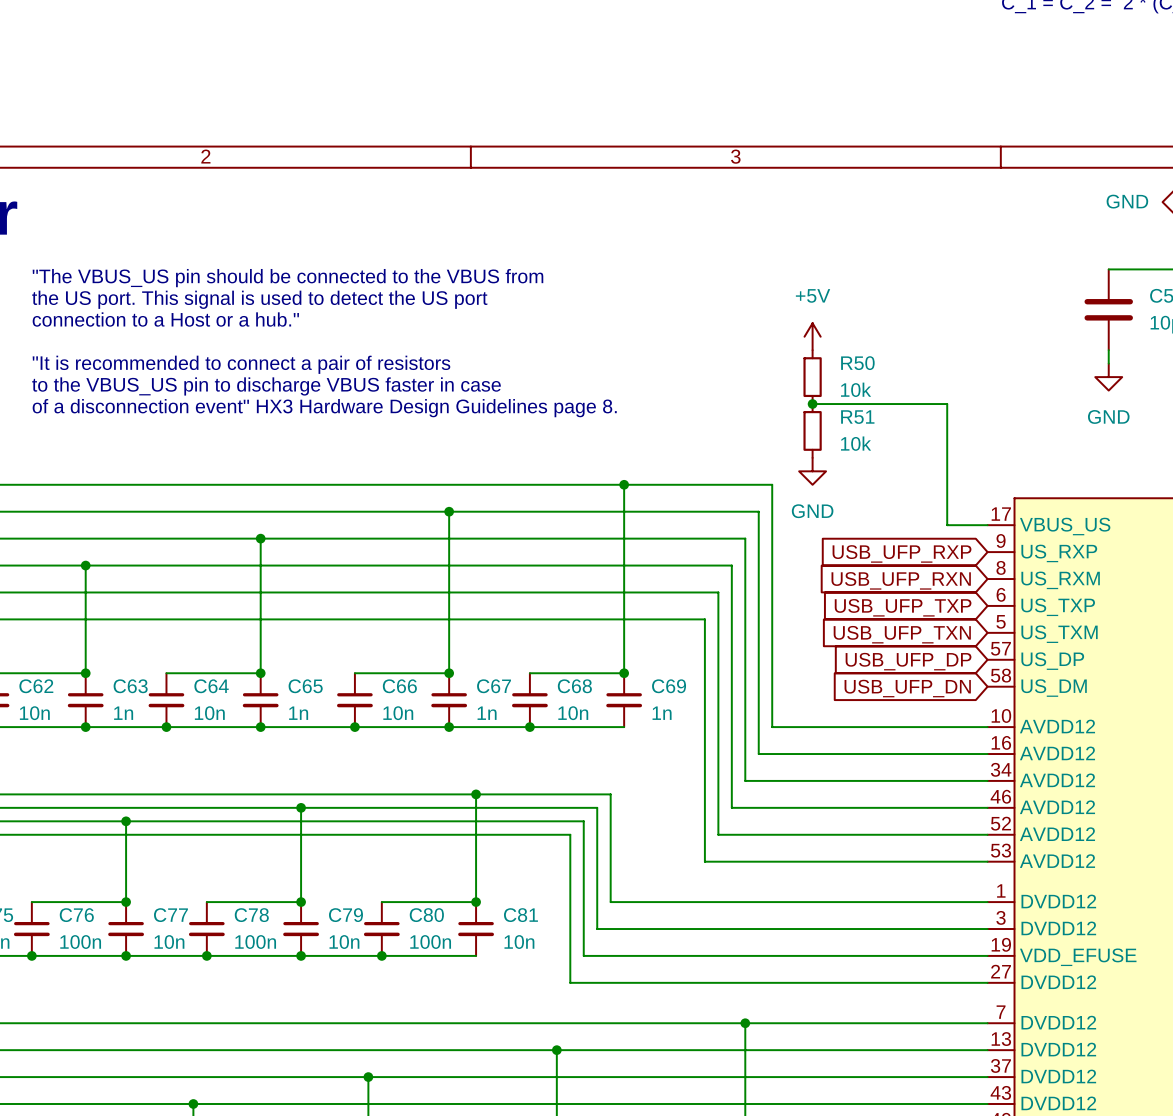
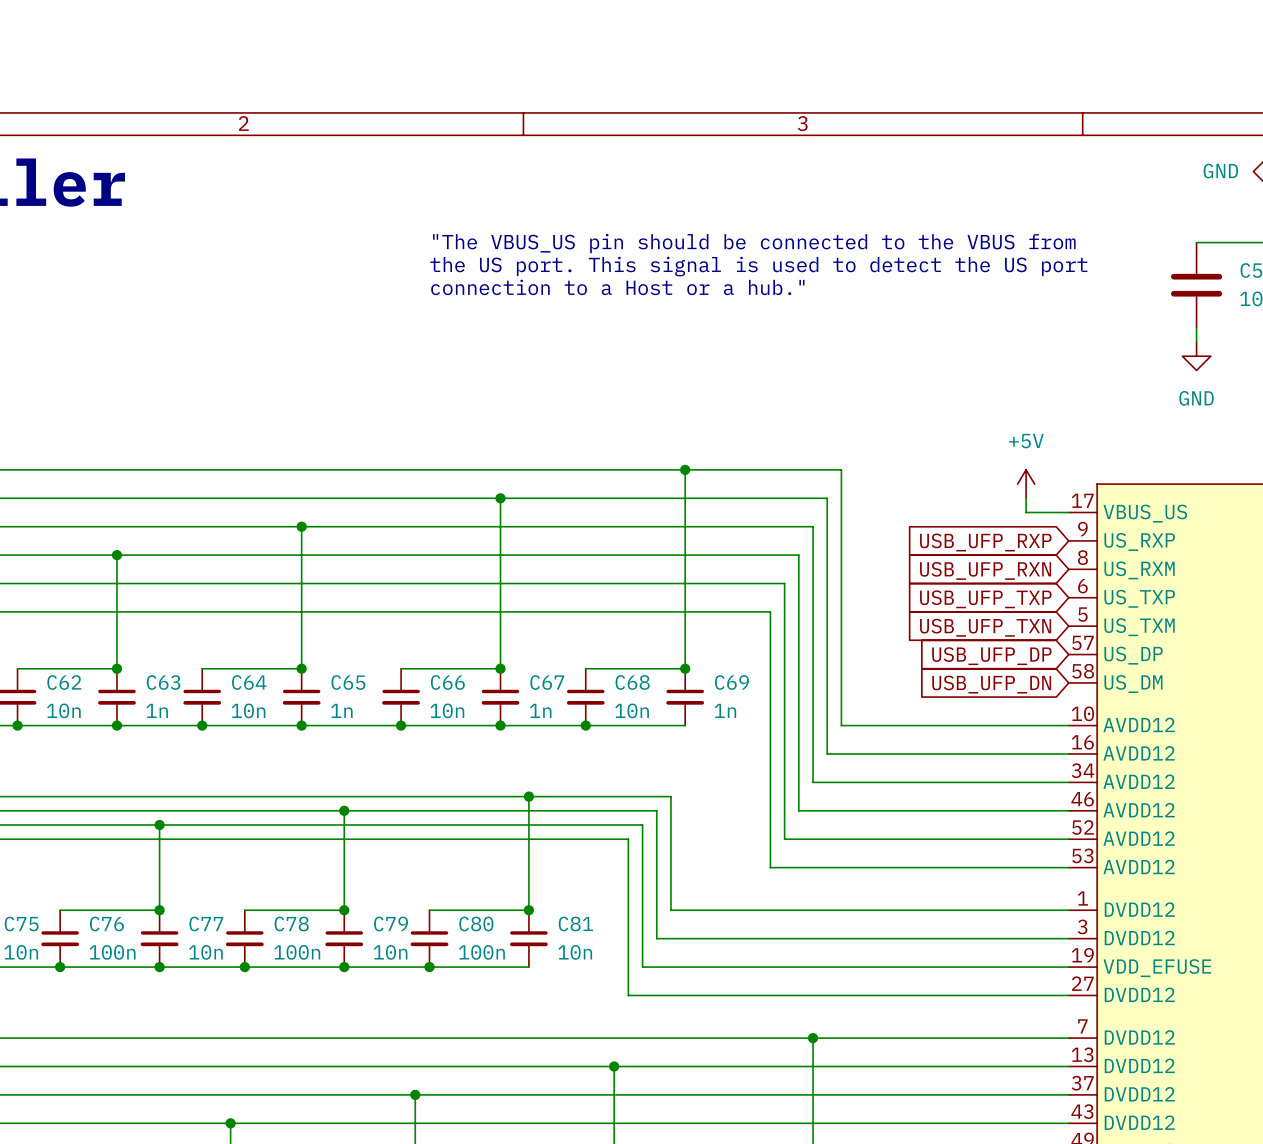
text: none -> "The VBUS_US pin should be connected to the VBUS from (754, 243)
text: "The VBUS_US pin should be connected to the VBUS from (287, 278) -> none
text: none -> the US port. This signal is used to detect the US port (758, 266)
text: the US port. This signal is used to detect the US port (259, 299) -> none
text: none -> connection to a Host or a hub." (617, 287)
text: connection to a Host or a hub." (165, 319) -> none
power symbol position: +5V (812, 336) -> +5V (1026, 484)
text: "It is recommended to connect a pair of resistors (241, 364) -> none
R50: 10k (812, 377) -> none
text: to the VBUS_US pin to discharge VBUS faster in case (266, 386) -> none
wire: (812, 404) (947, 404) (947, 511) -> none
junction: (812, 404) -> none
text: of a disconnection event" HX3 Hardware Design Guidelines page 8. (324, 408) -> none
R51: 10k (812, 430) -> none
power symbol: GND (812, 471) -> none

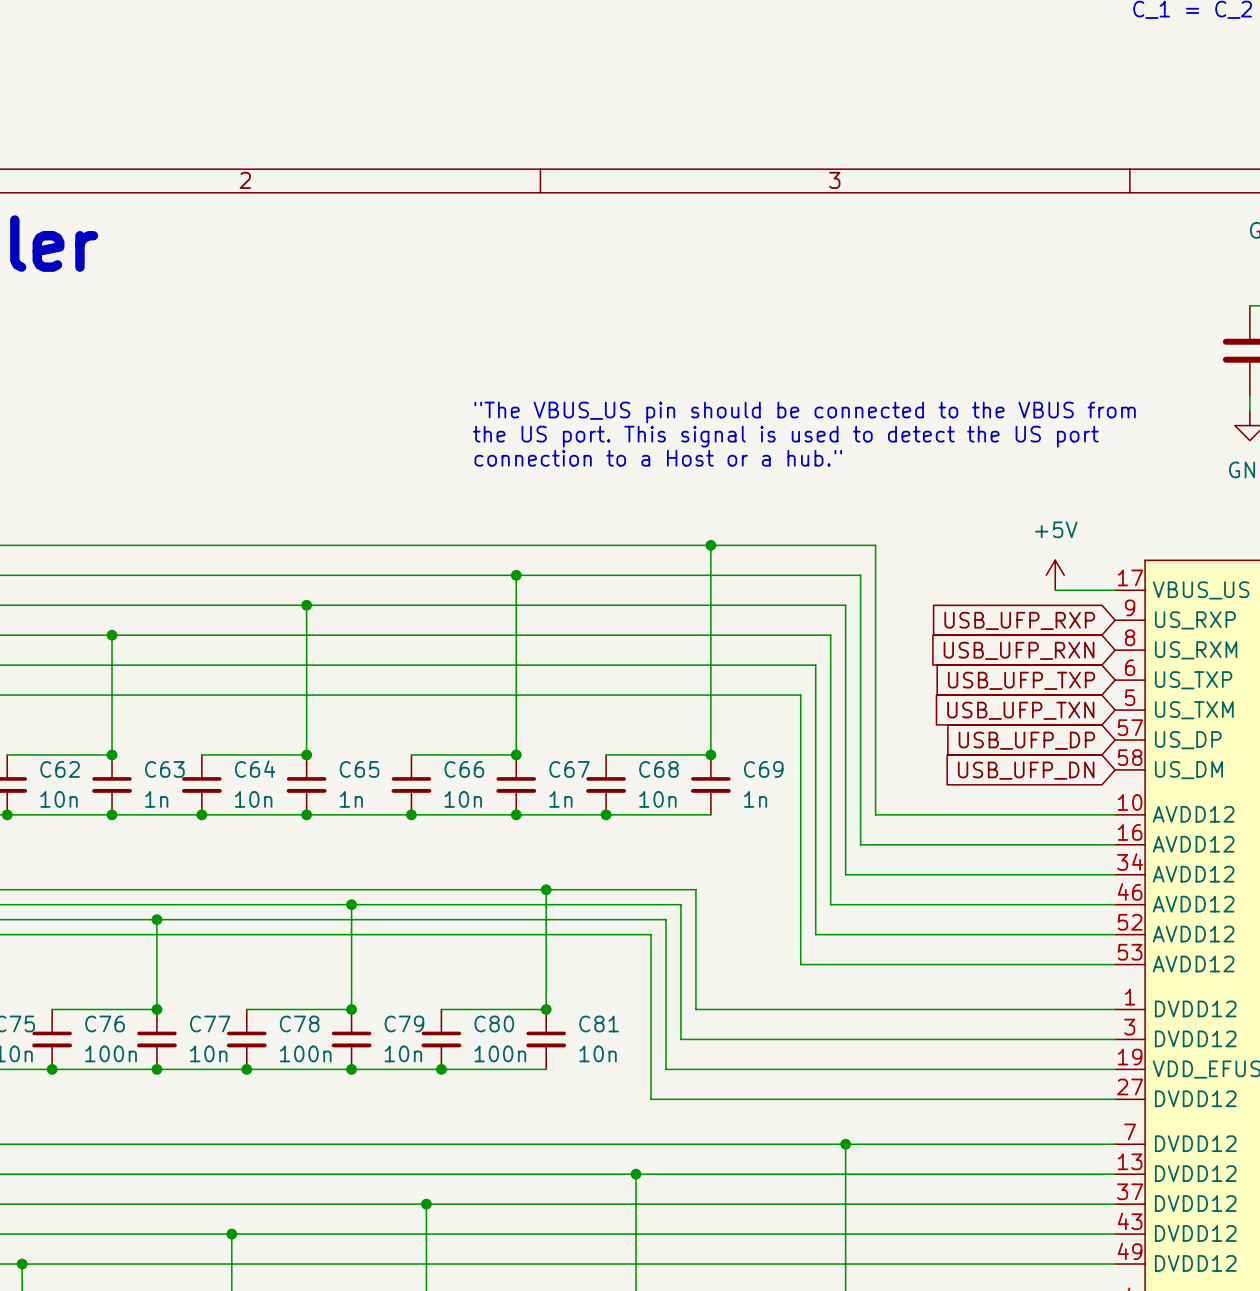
text position: "The VBUS_US pin should be connected to the VBUS from (754, 243) -> "The VBUS_US pin should be connected to the VBUS from (805, 412)
text position: the US port. This signal is used to detect the US port (758, 266) -> the US port. This signal is used to detect the US port (785, 436)
text position: connection to a Host or a hub." (617, 287) -> connection to a Host or a hub." (658, 458)
power symbol position: +5V (1026, 484) -> +5V (1055, 575)
wire: (1026, 498) (1026, 512) -> (1055, 590) (1070, 590)

